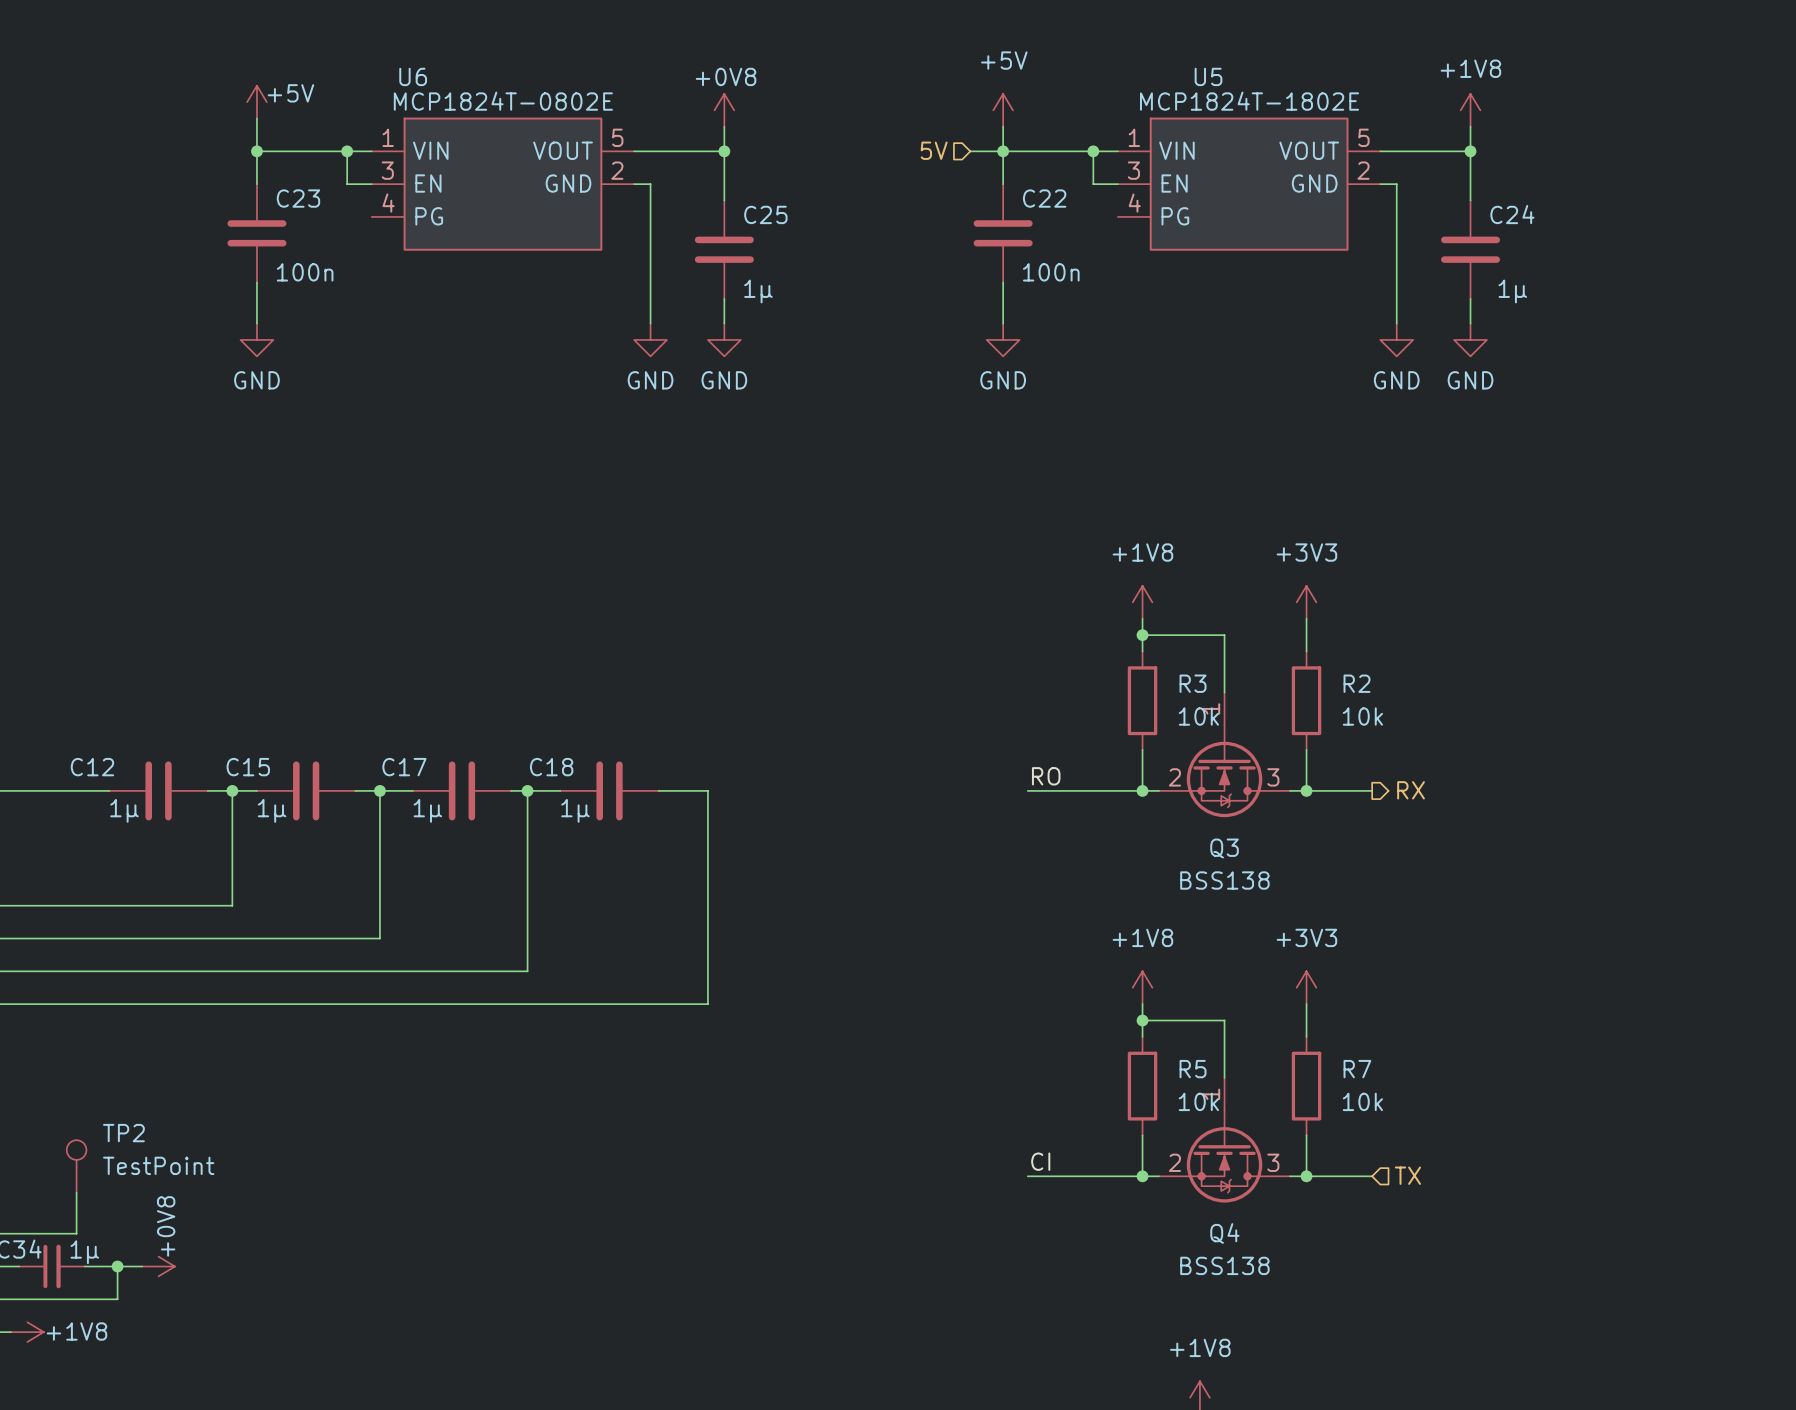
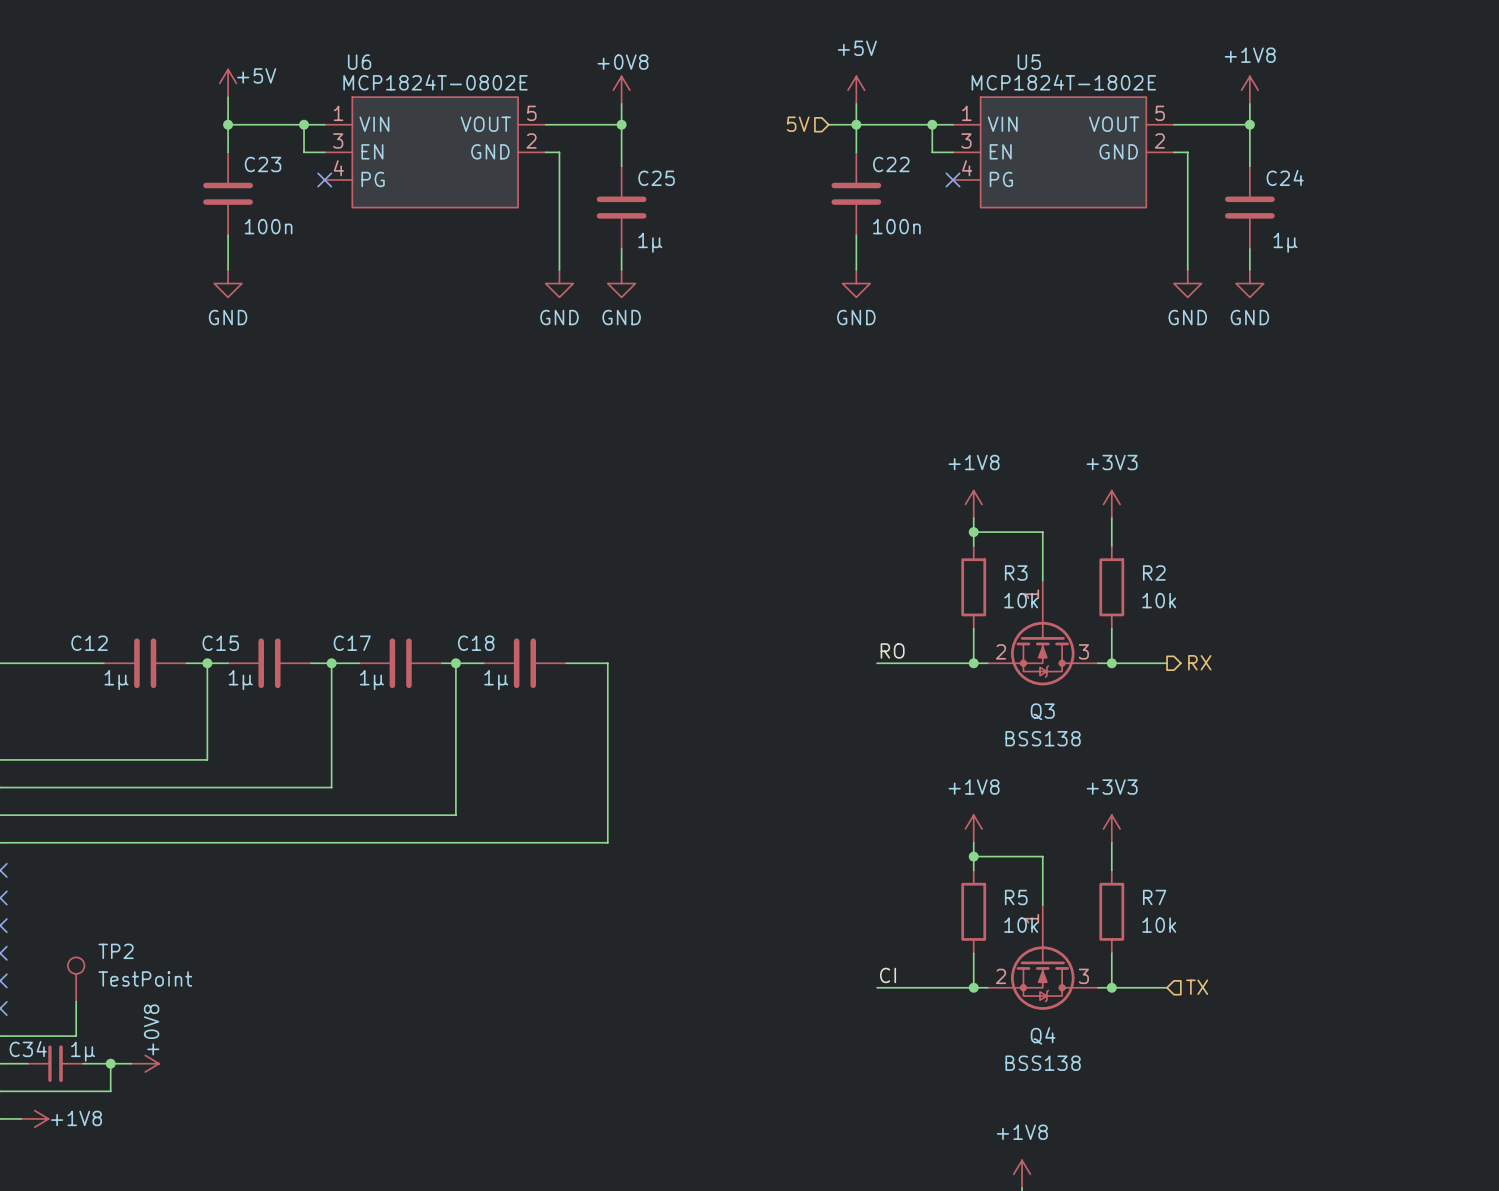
no-connect mark: none -> (324, 179)
no-connect mark: none -> (953, 179)

